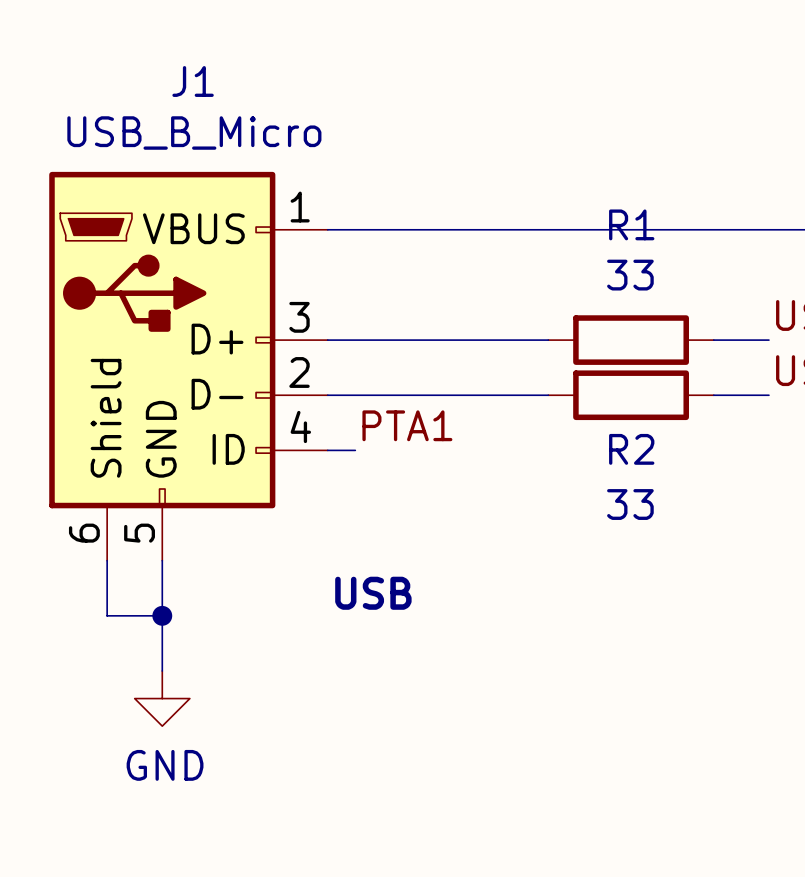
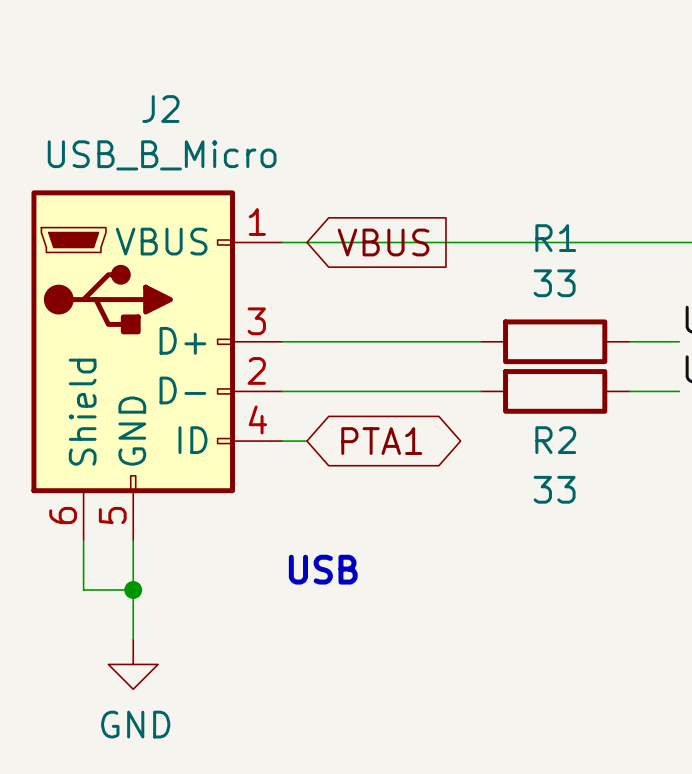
J1 name: J1 (193, 81) -> J2 (160, 109)
global label: none -> VBUS (383, 242)
label: PTA1 (407, 425) -> none
global label: none -> PTA1 (381, 441)

